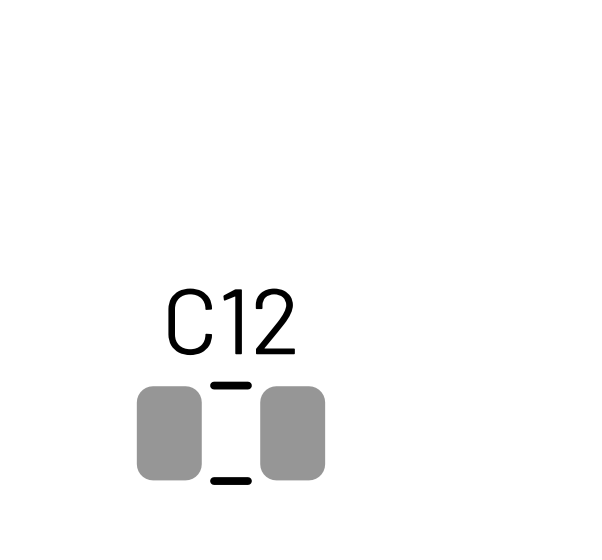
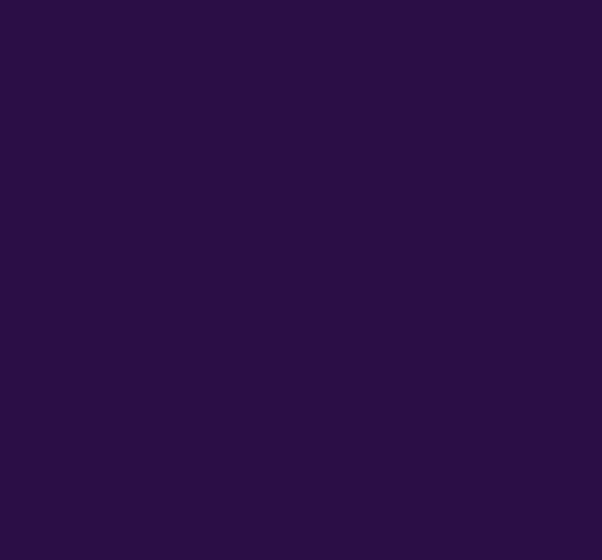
C12: (230, 433) -> none

